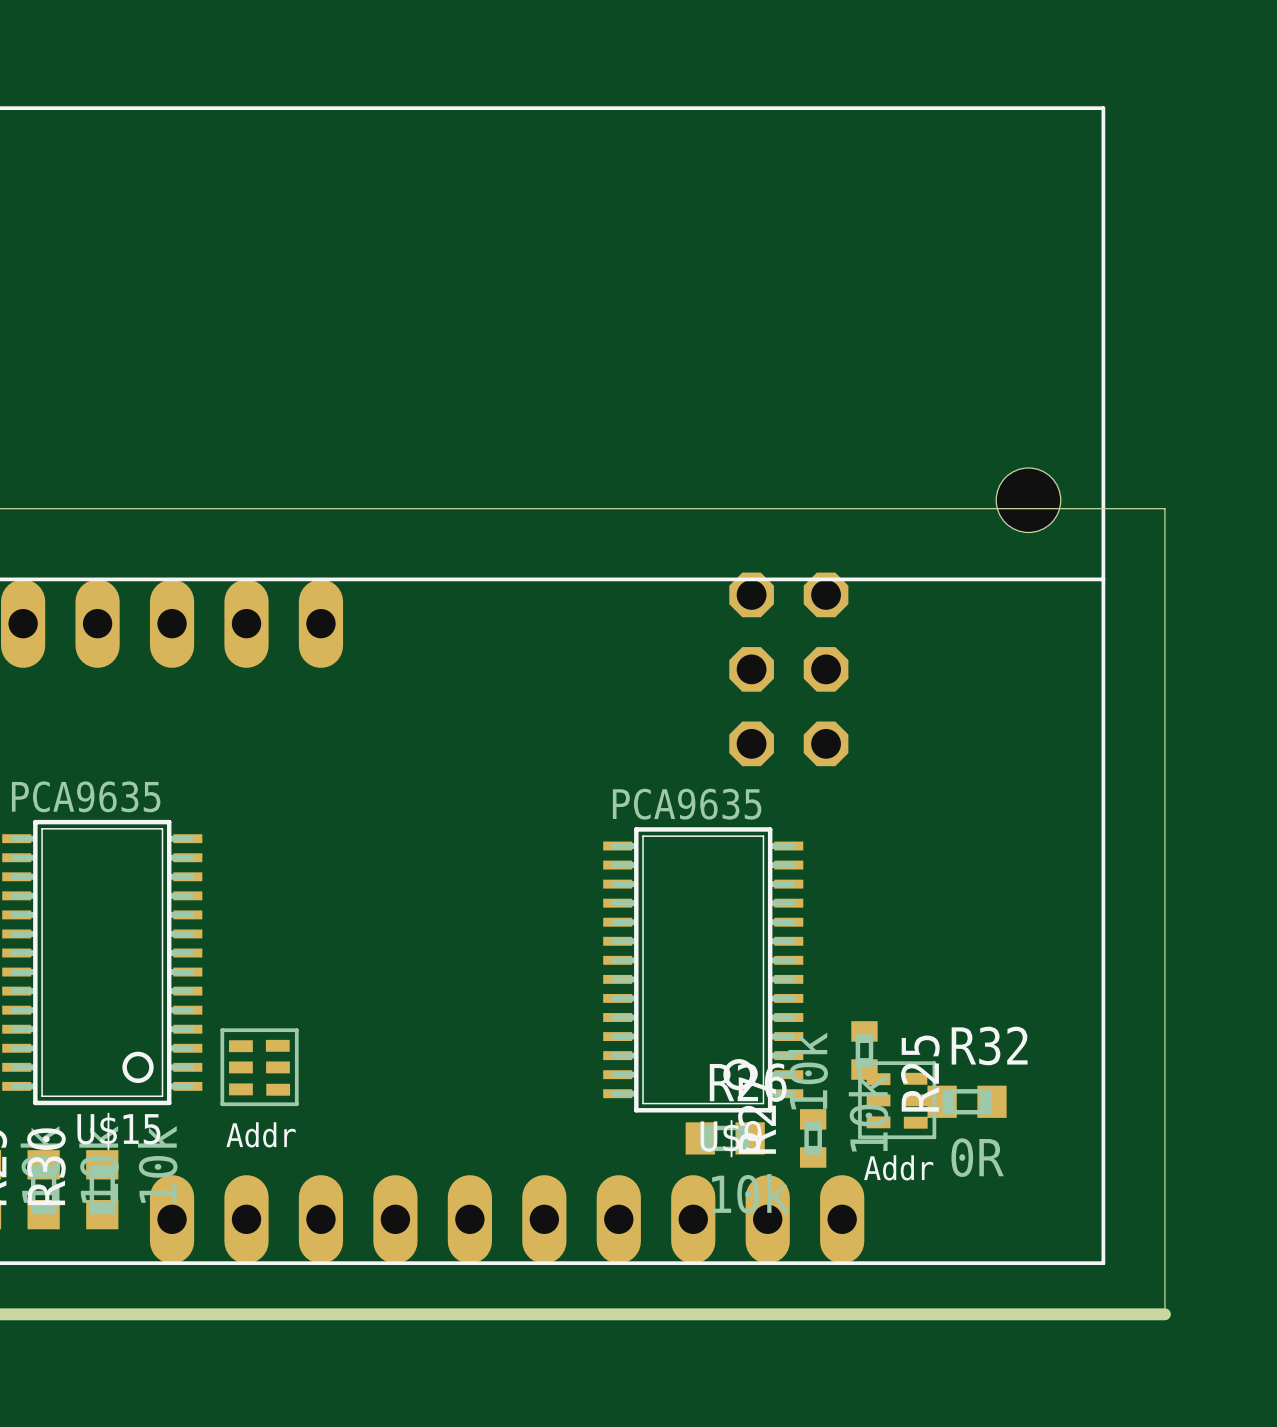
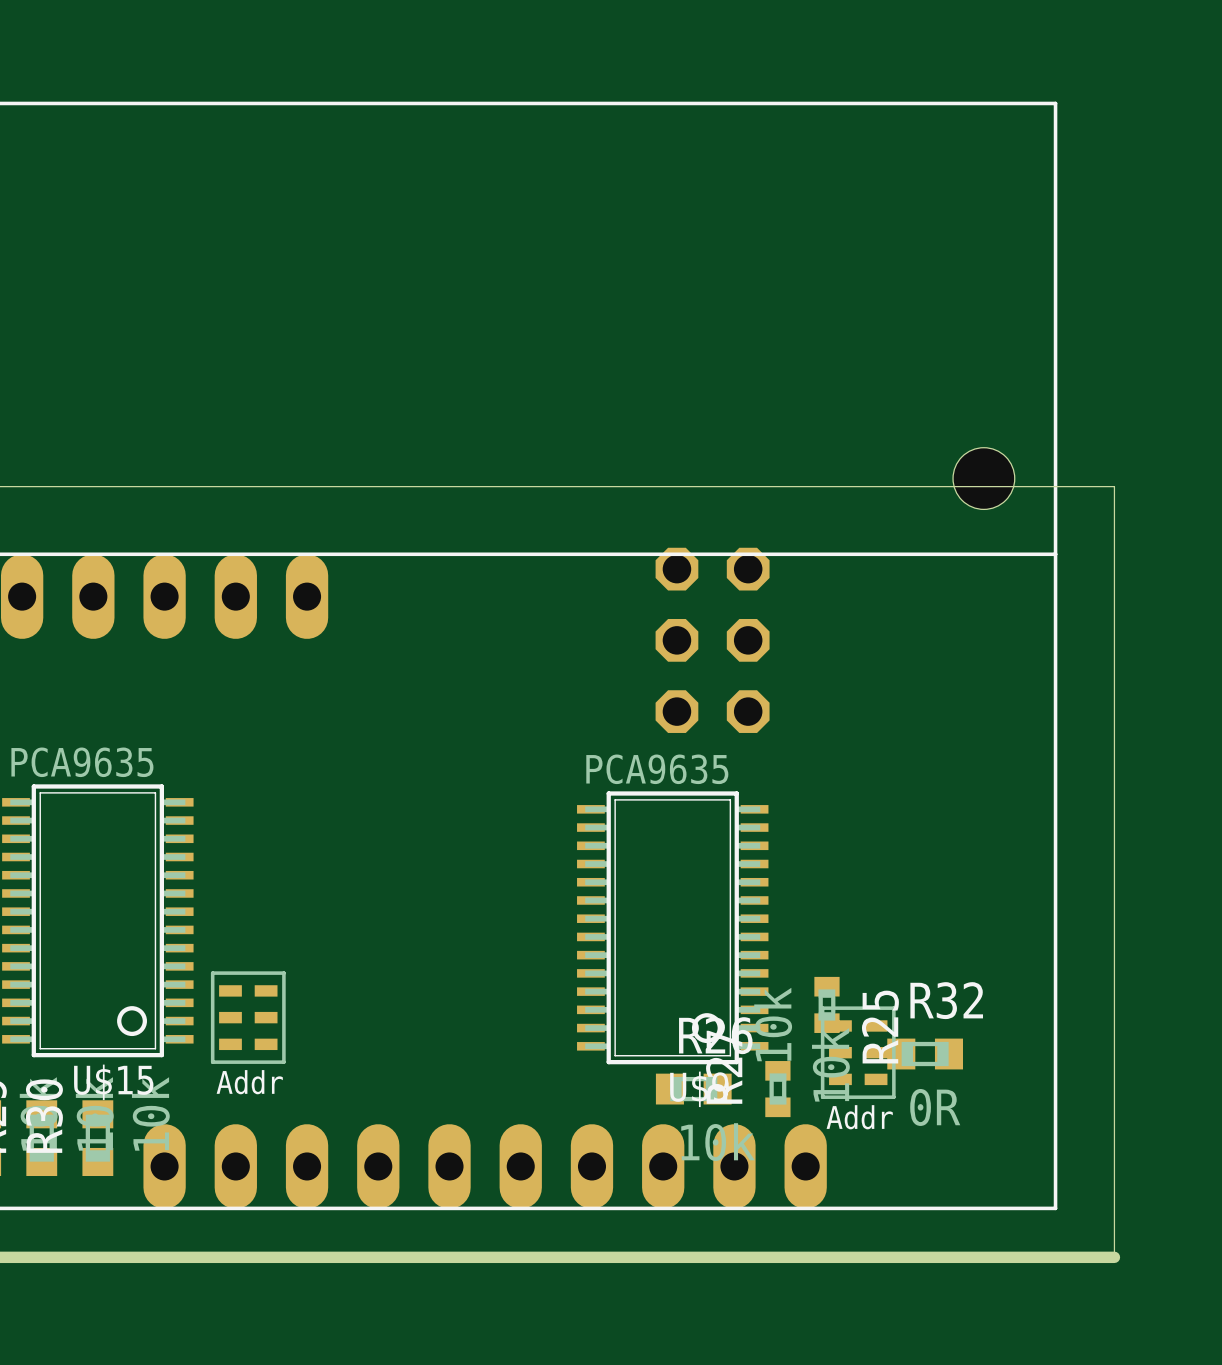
part position: (788, 669) -> (712, 640)
part footprint: [220, 1028, 299, 1107] -> [210, 971, 286, 1064]
part footprint: [858, 1061, 937, 1140] -> [820, 1006, 896, 1099]

